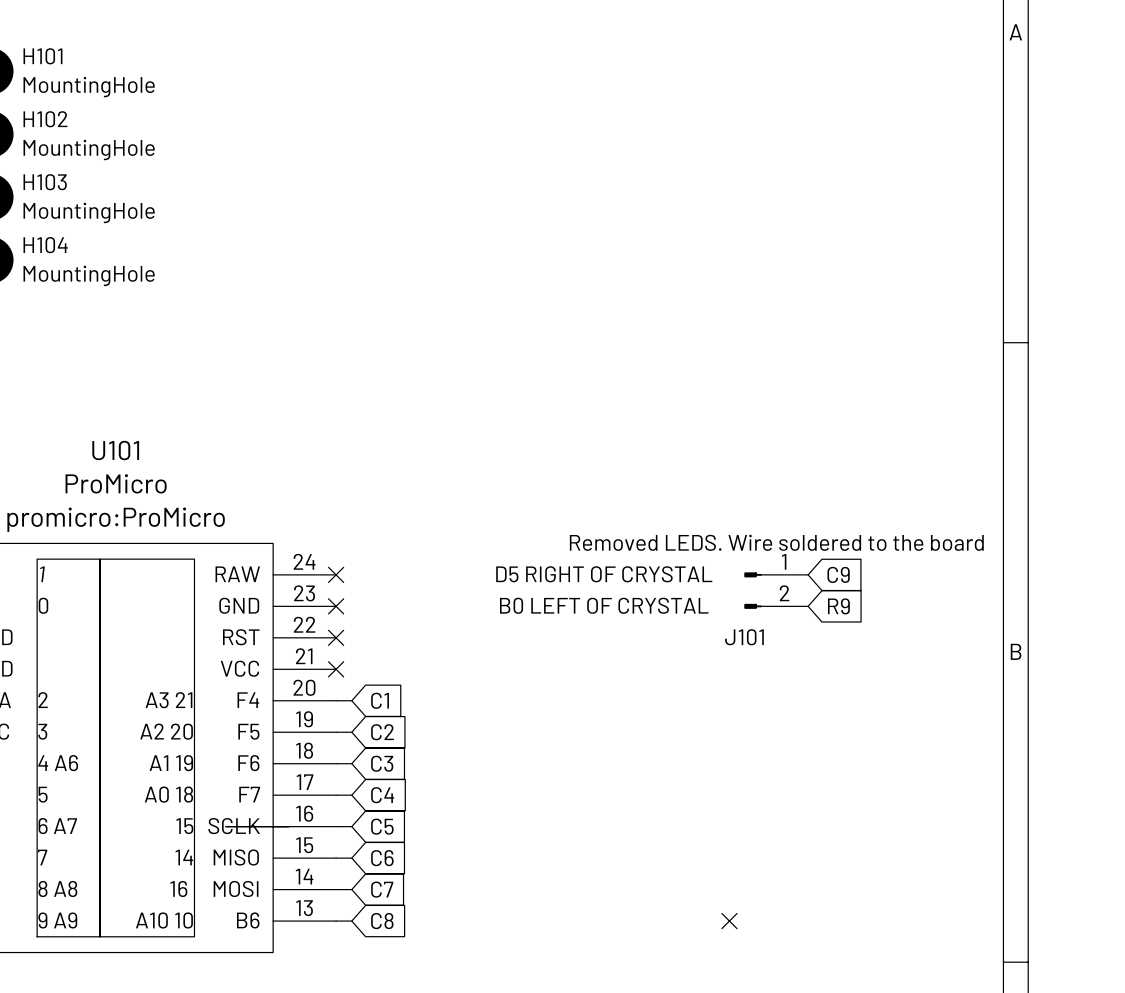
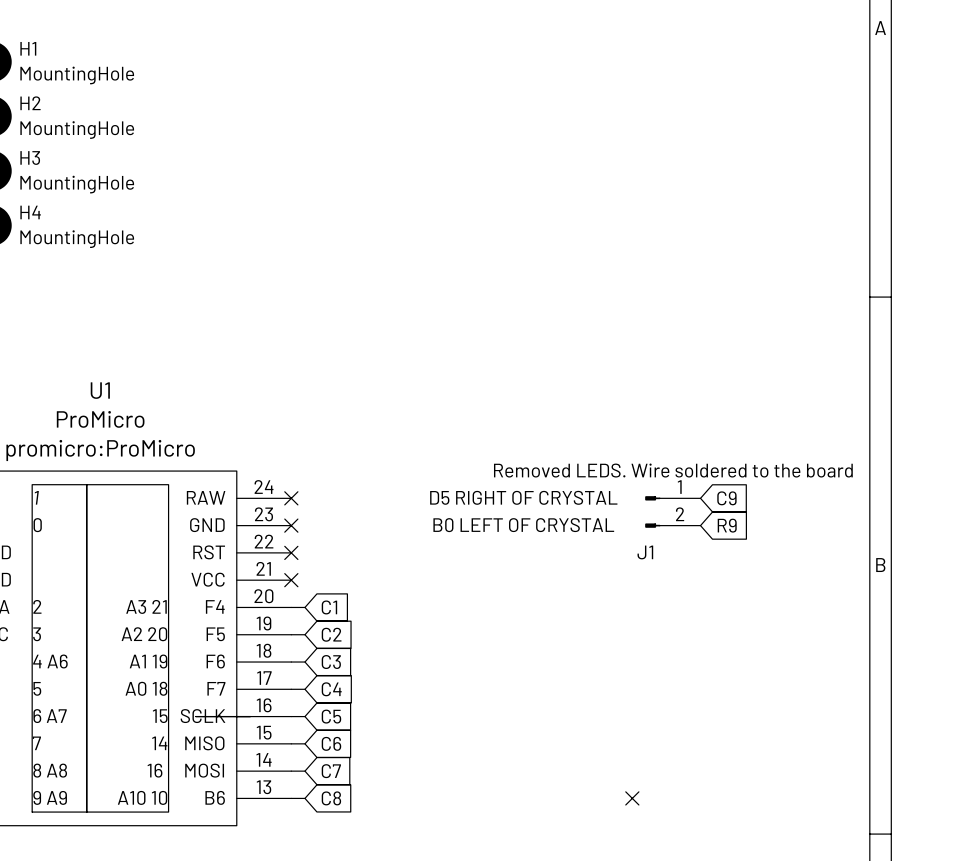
H101 name: H101 (42, 56) -> H1 (28, 48)
H102 name: H102 (45, 119) -> H2 (30, 103)
H103 name: H103 (45, 182) -> H3 (30, 158)
H104 name: H104 (45, 245) -> H4 (30, 212)
U101 name: U101 (115, 450) -> U1 (100, 390)
J101 name: J101 (744, 637) -> J1 (645, 552)

